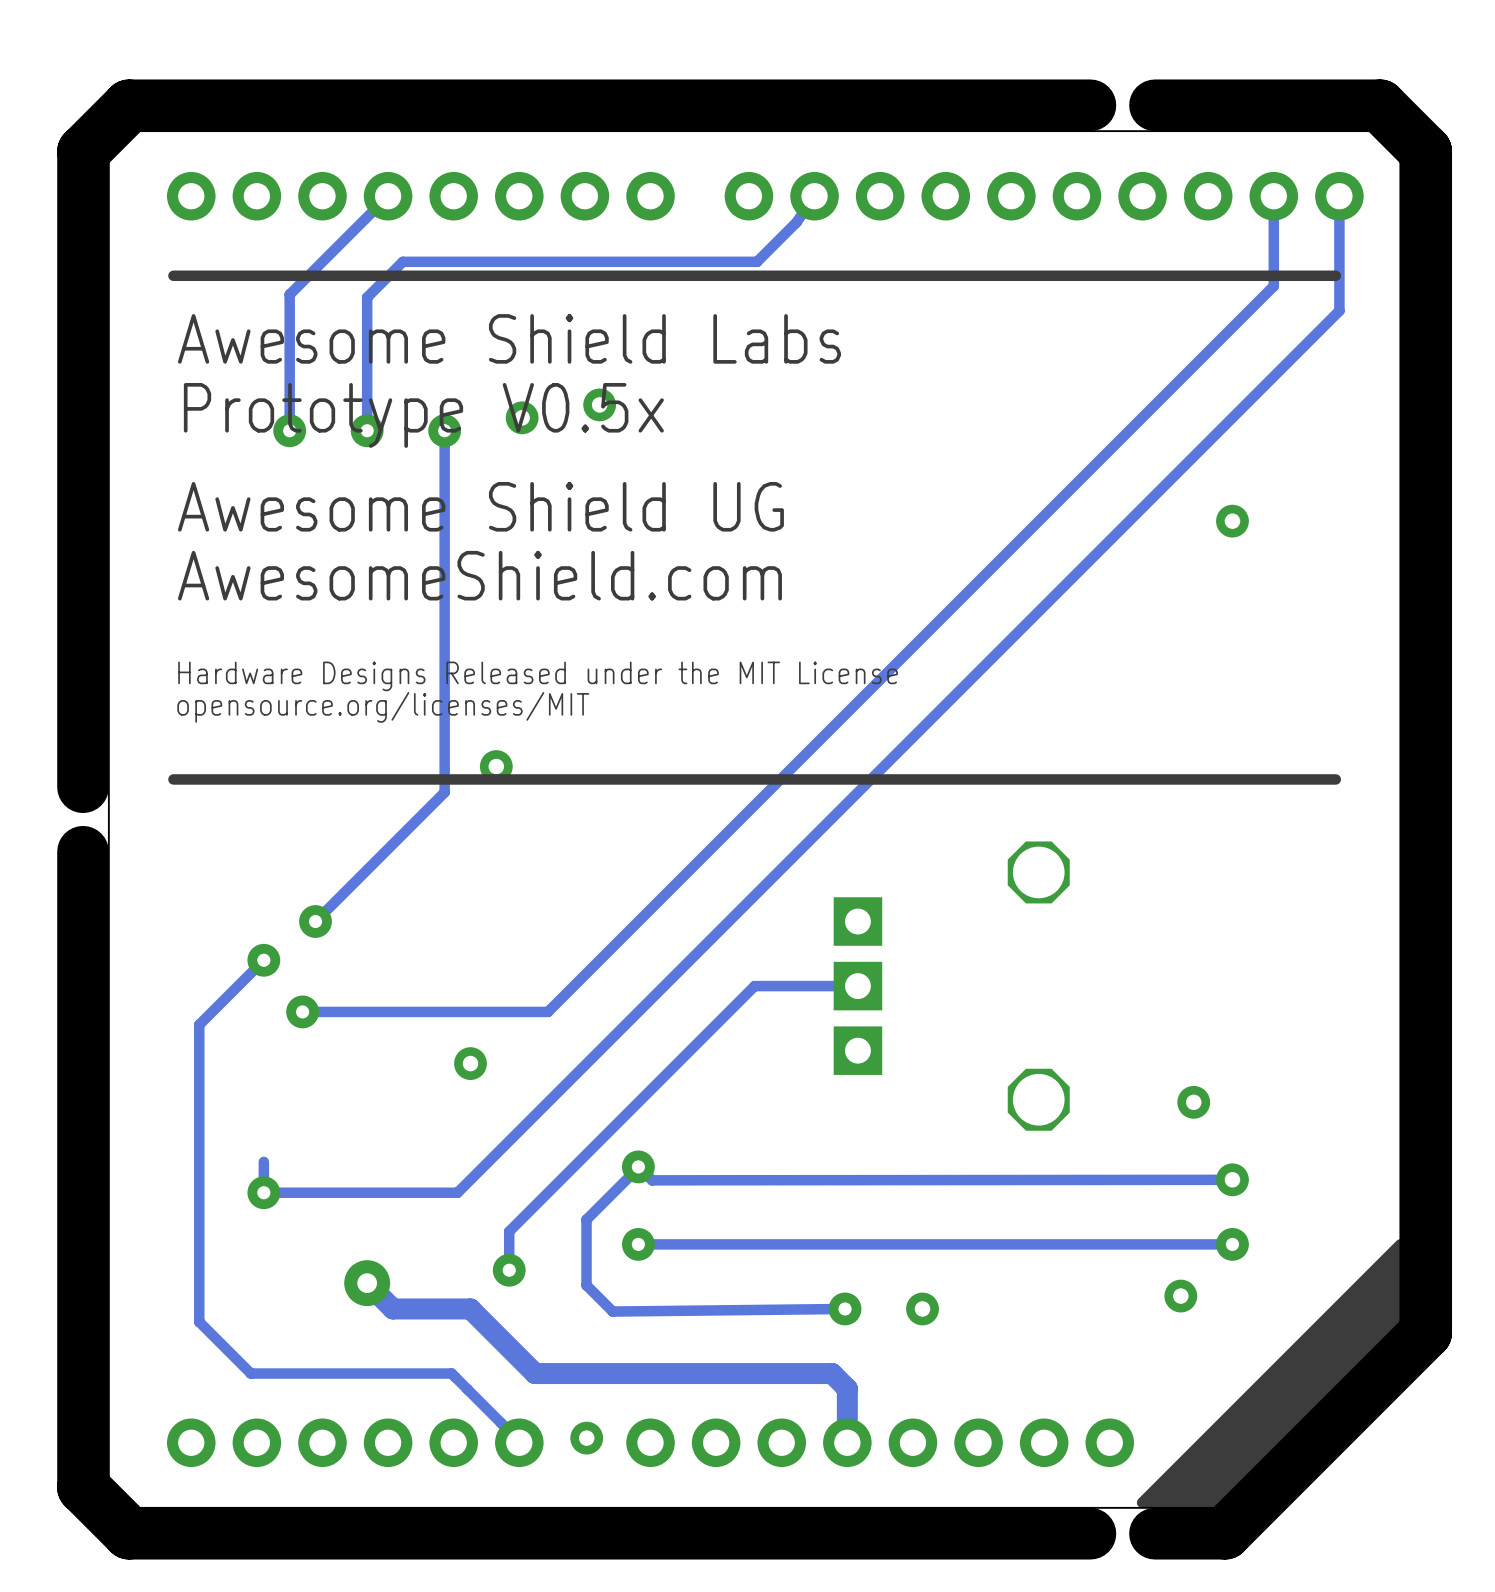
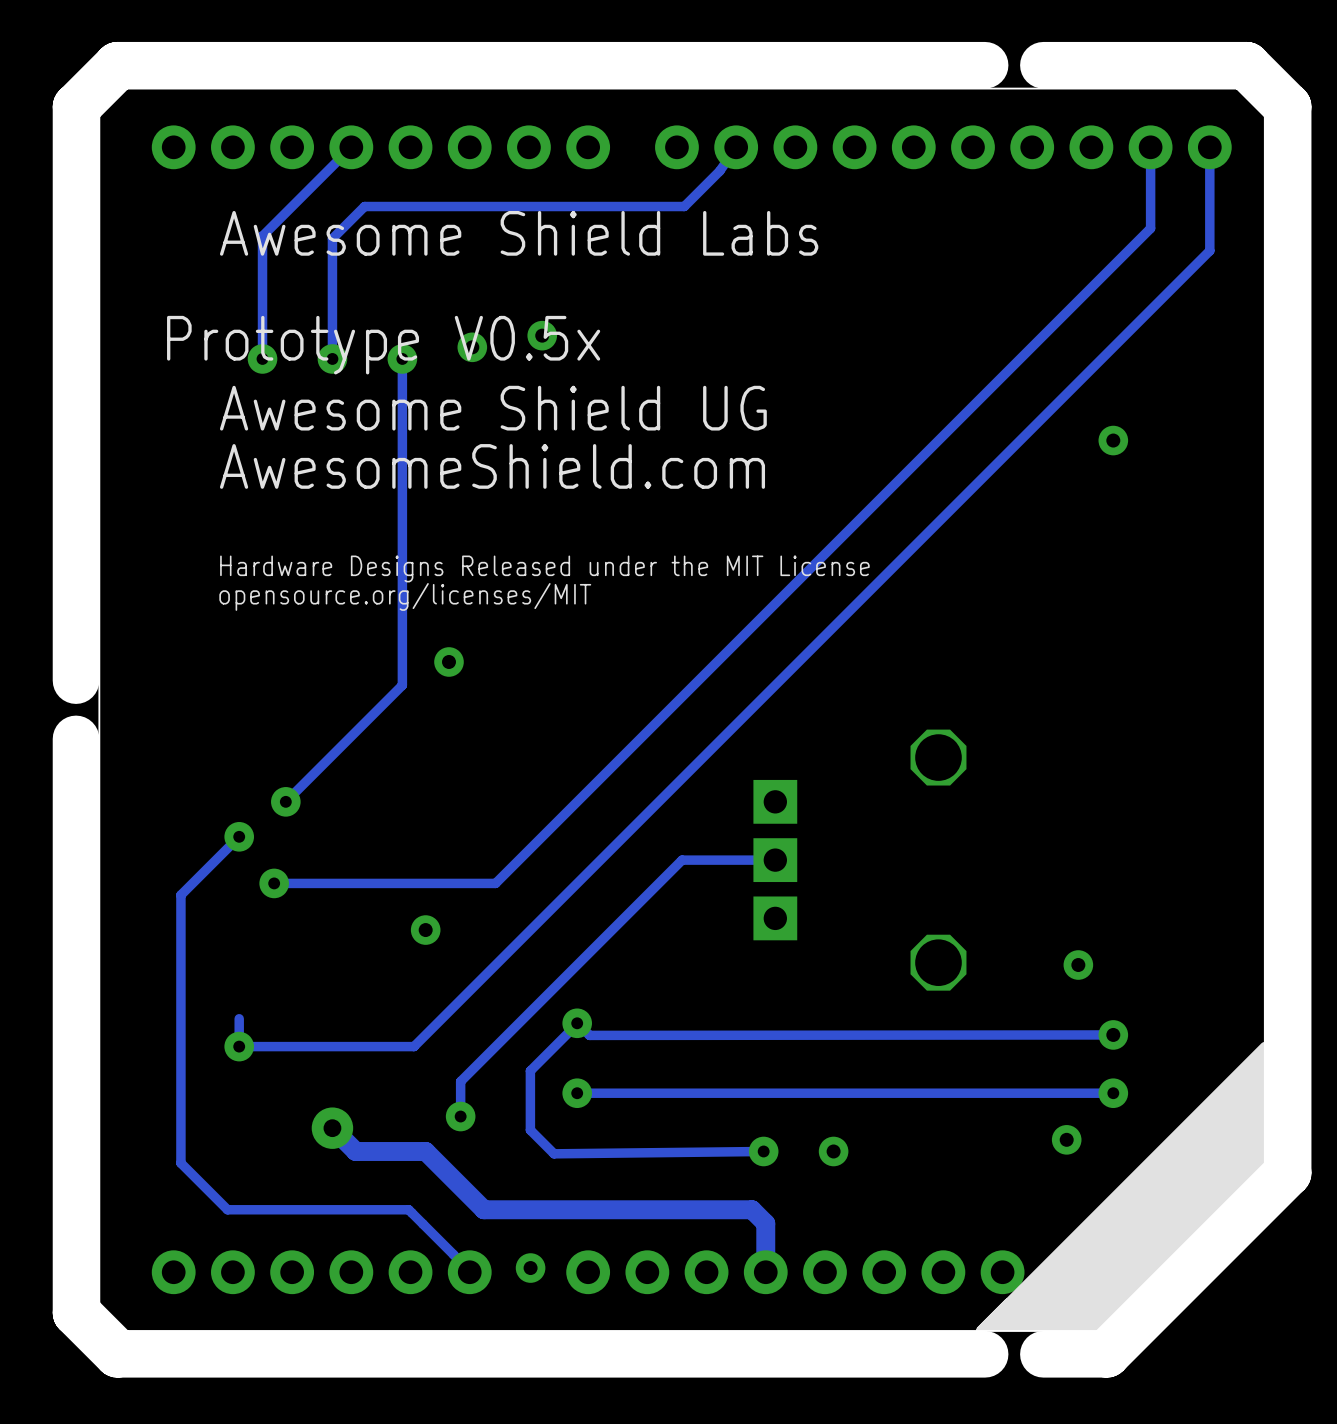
line: (1335, 275) (173, 275) -> none
text position: Awesome Shield Labs (509, 338) -> Awesome Shield Labs (519, 233)
text position: Awesome Shield UG (480, 506) -> Awesome Shield UG (493, 408)
text position: AwesomeShield.com (479, 575) -> AwesomeShield.com (492, 466)
text position: Hardware Designs Released under the MIT License (538, 676) -> Hardware Designs Released under the MIT License (544, 568)
text position: opensource.org/licenses/MIT (383, 707) -> opensource.org/licenses/MIT (405, 596)
line: (1335, 779) (173, 779) -> none
drawing: none -> [975, 1041, 1270, 1336]
drawing: [1136, 1239, 1406, 1508] -> none

